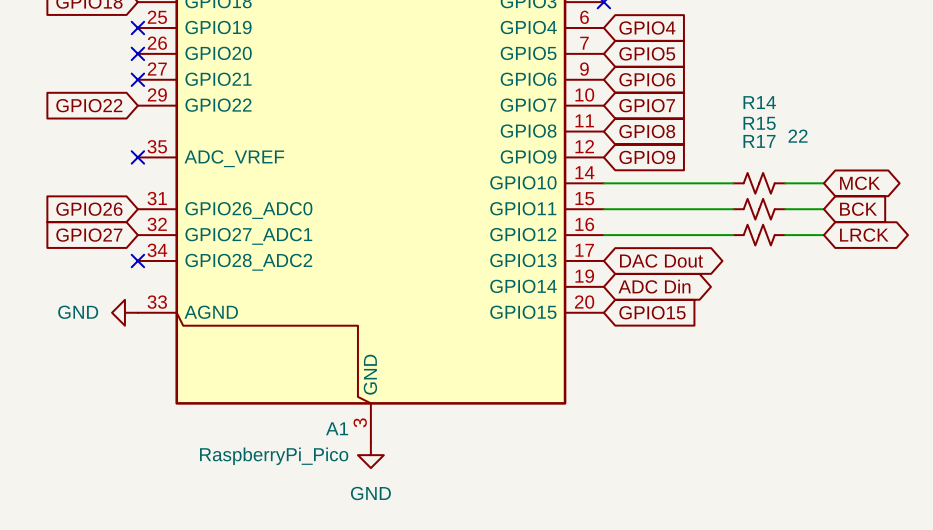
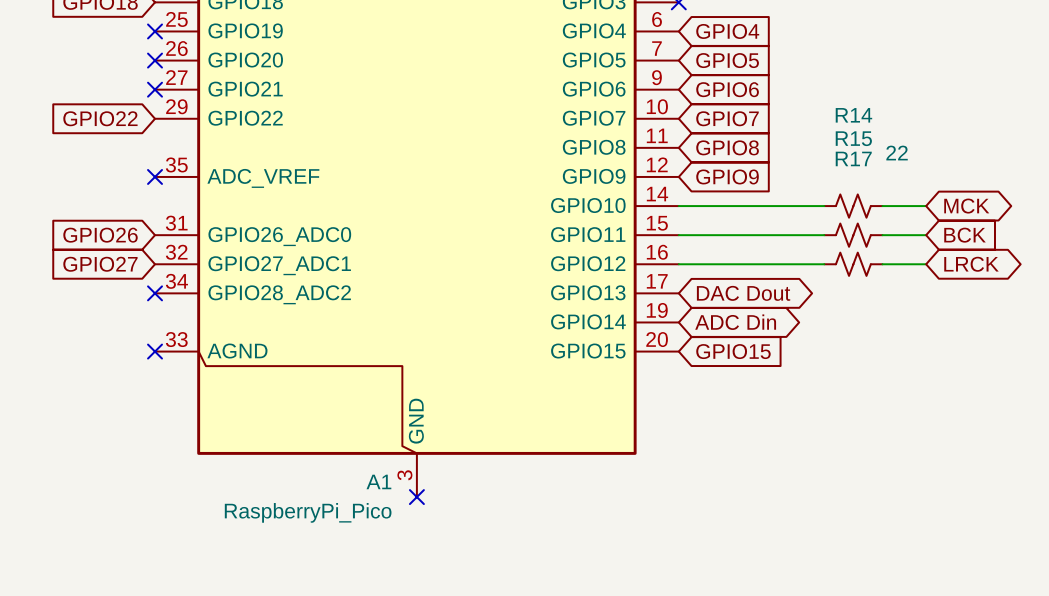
power symbol: GND (124, 312) -> none
no-connect mark: none -> (155, 351)
no-connect mark: none -> (416, 497)
power symbol: GND (370, 455) -> none

